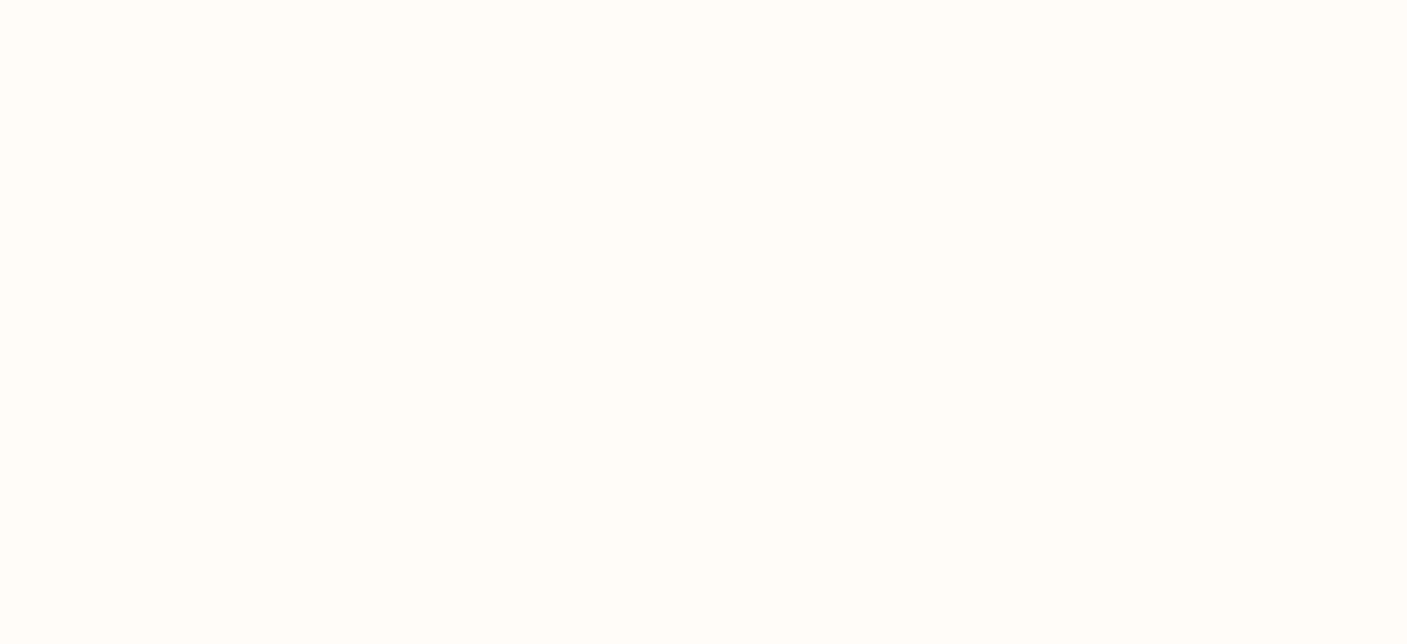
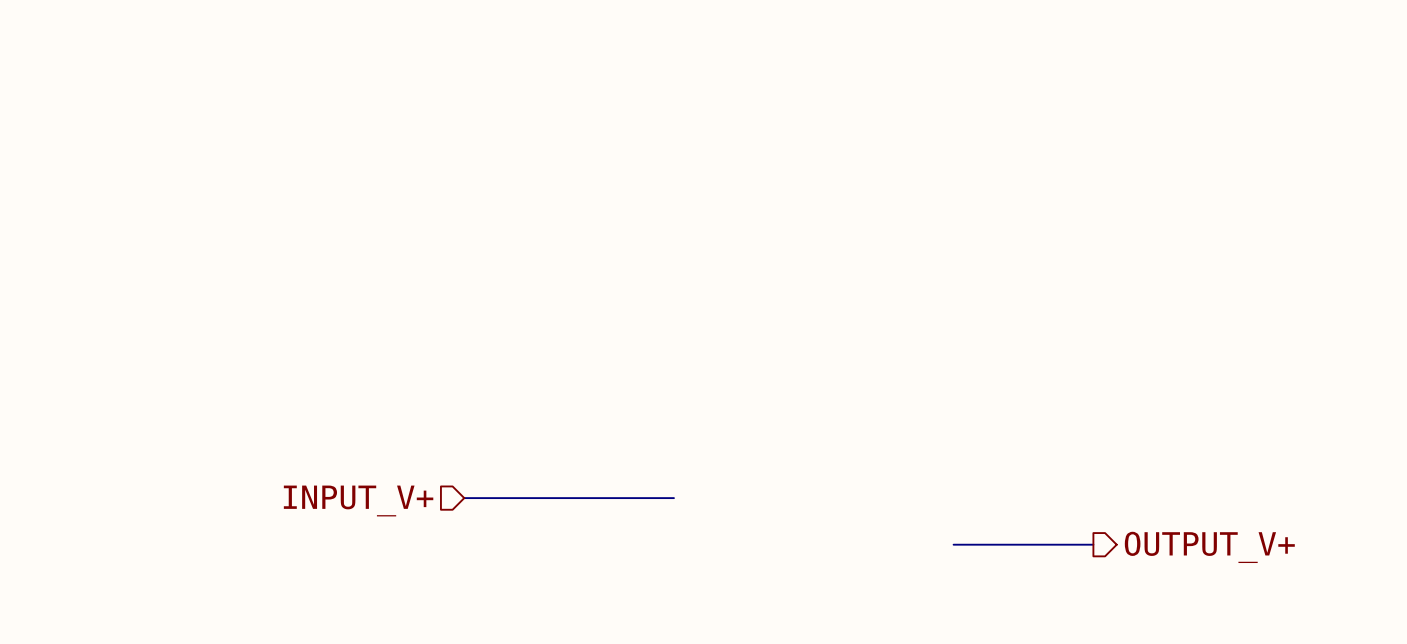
wire: none -> (464, 498) (673, 498)
hierarchical label: none -> INPUT_V+ (358, 500)
wire: none -> (953, 544) (1093, 544)
hierarchical label: none -> OUTPUT_V+ (1209, 547)

